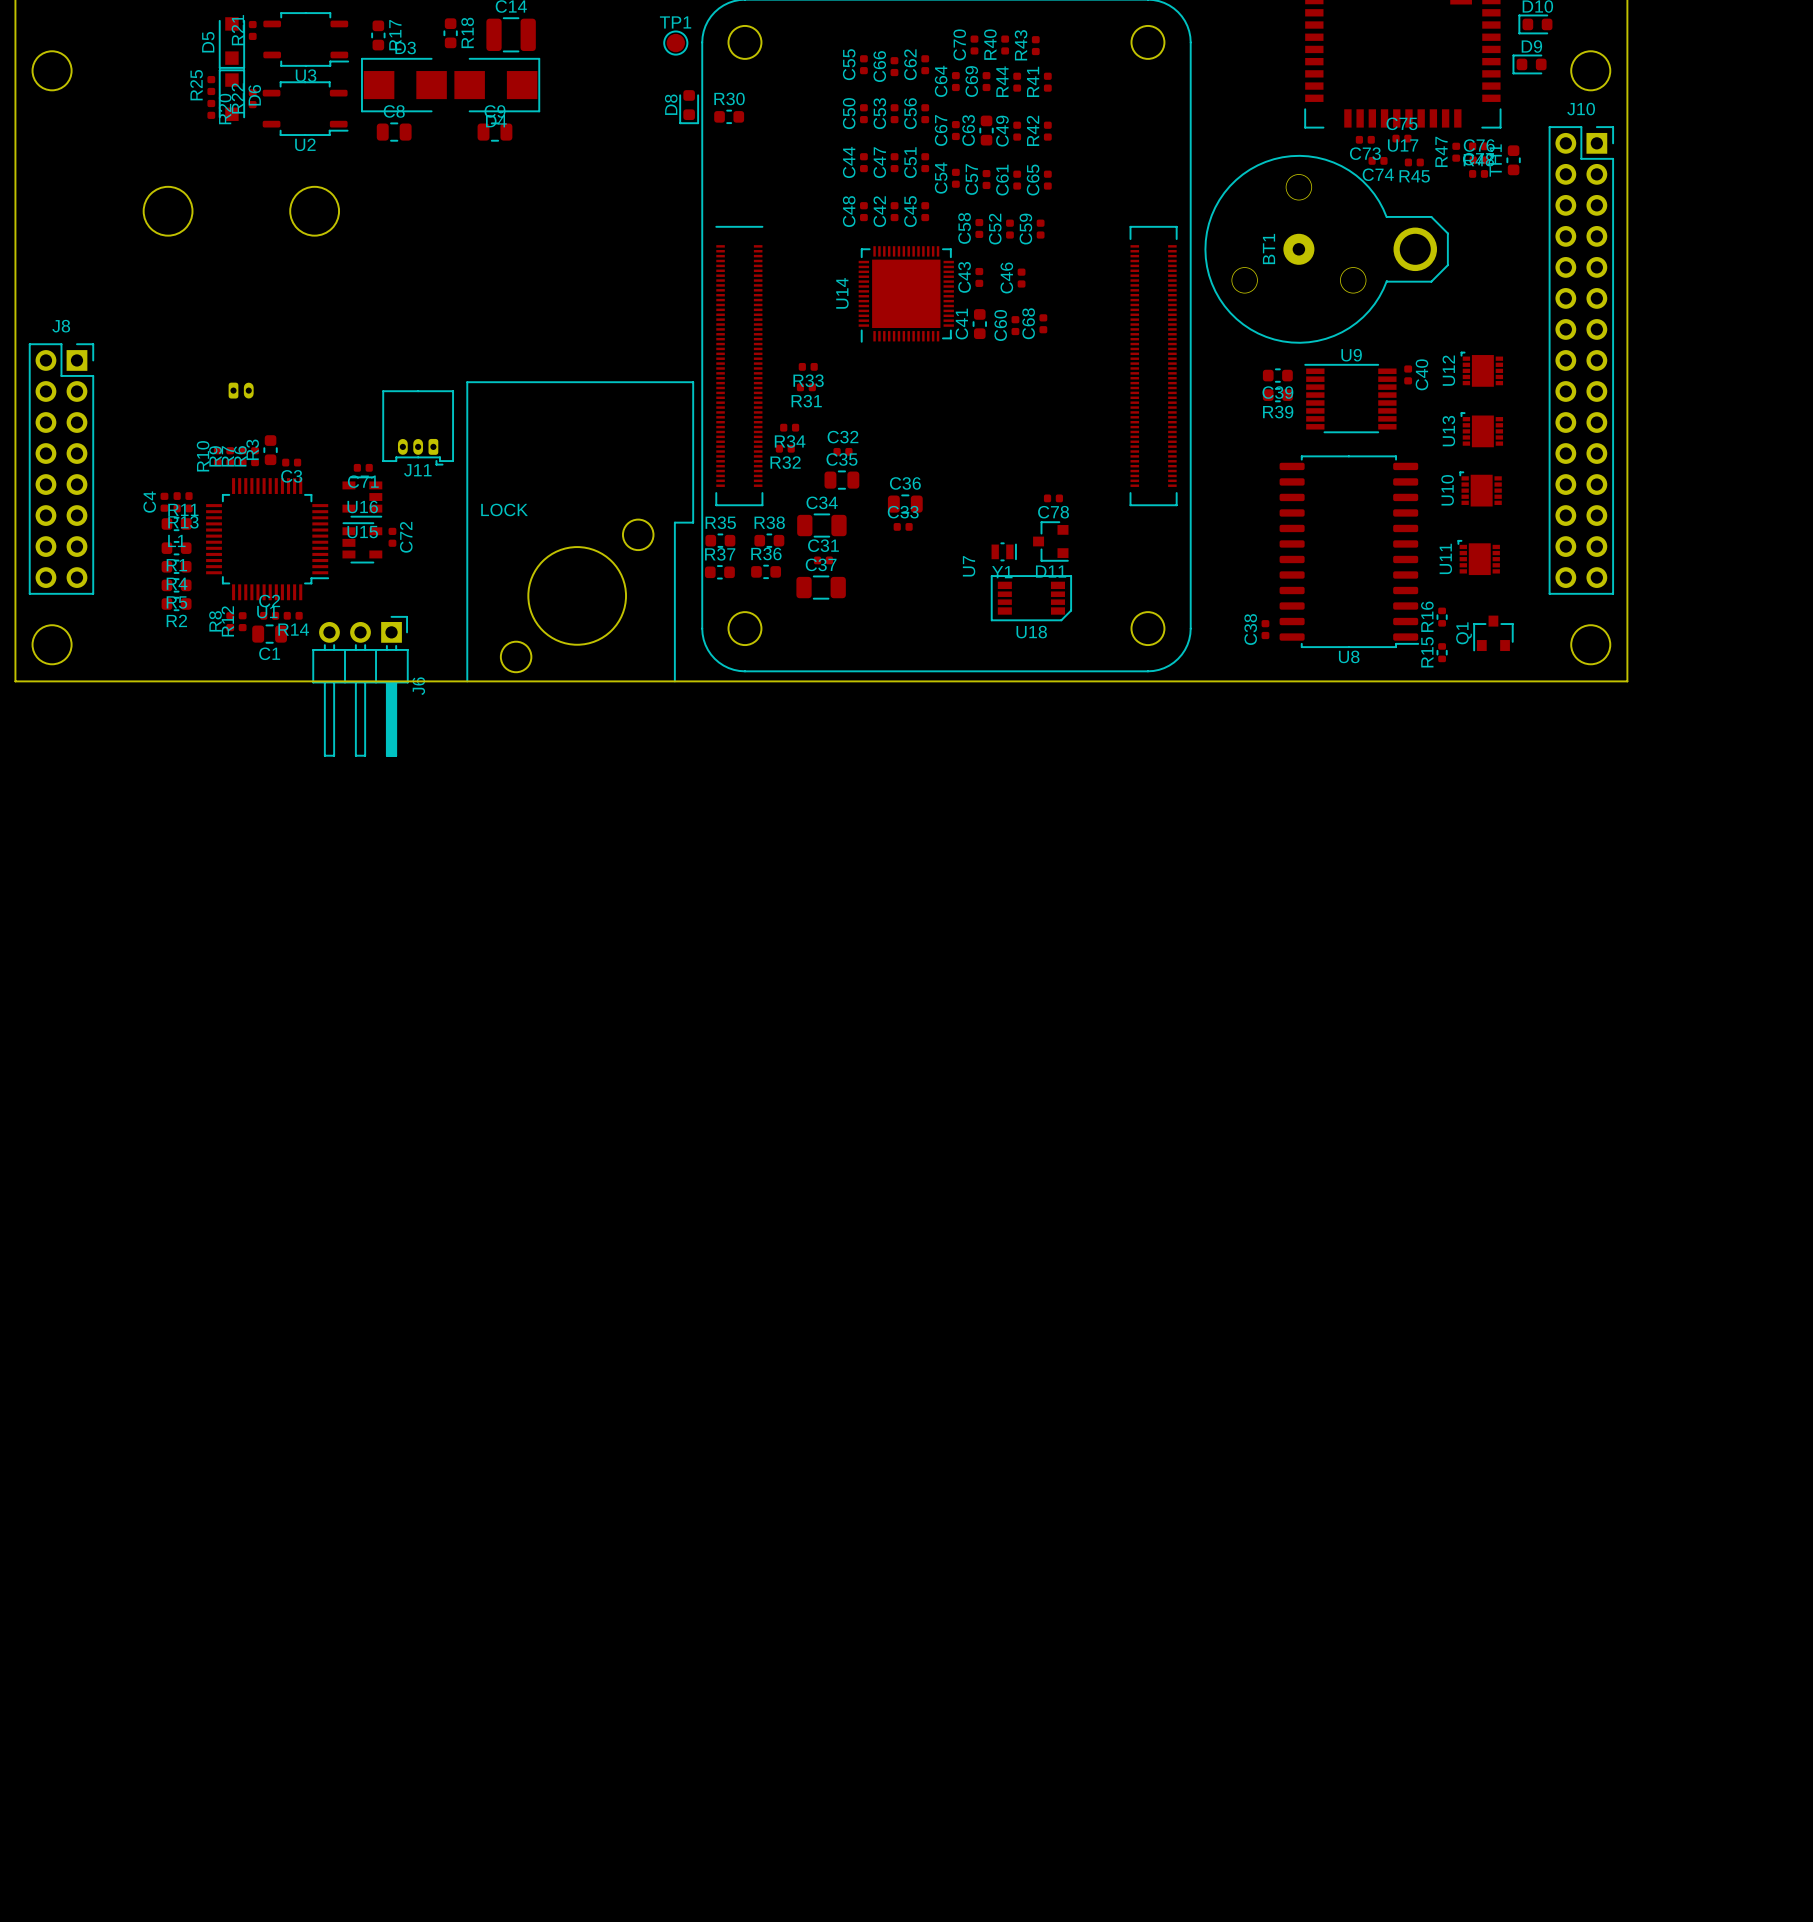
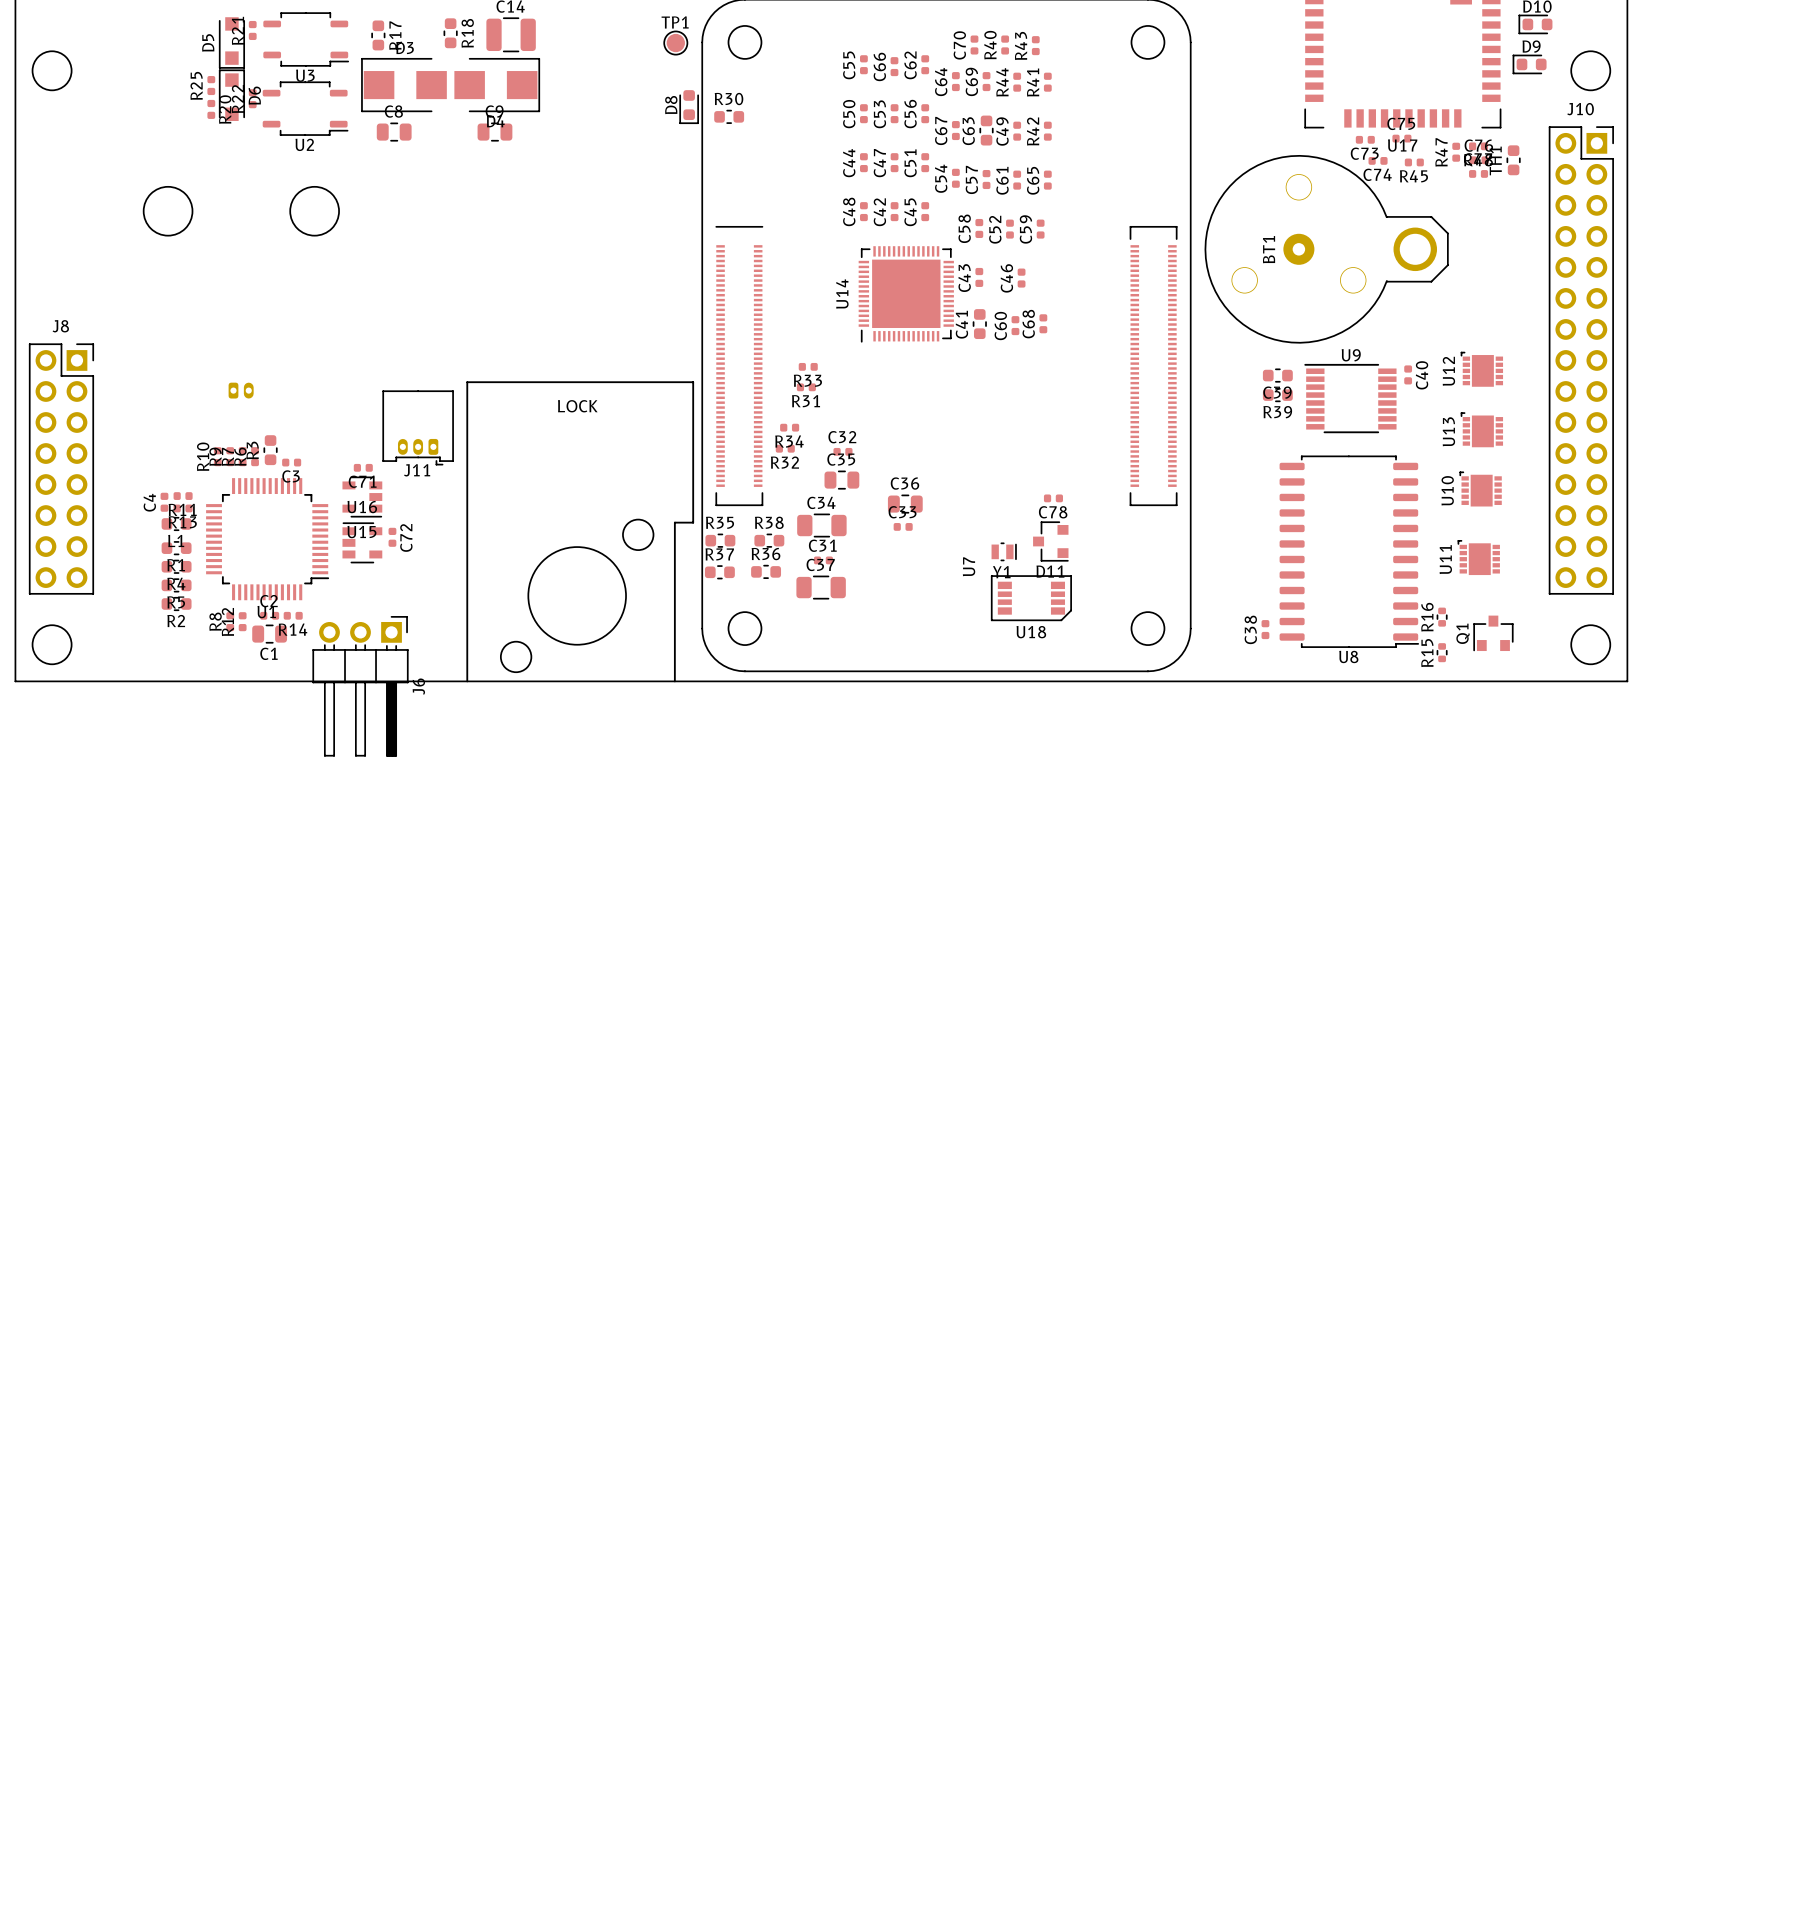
text position: LOCK (504, 509) -> LOCK (577, 406)

